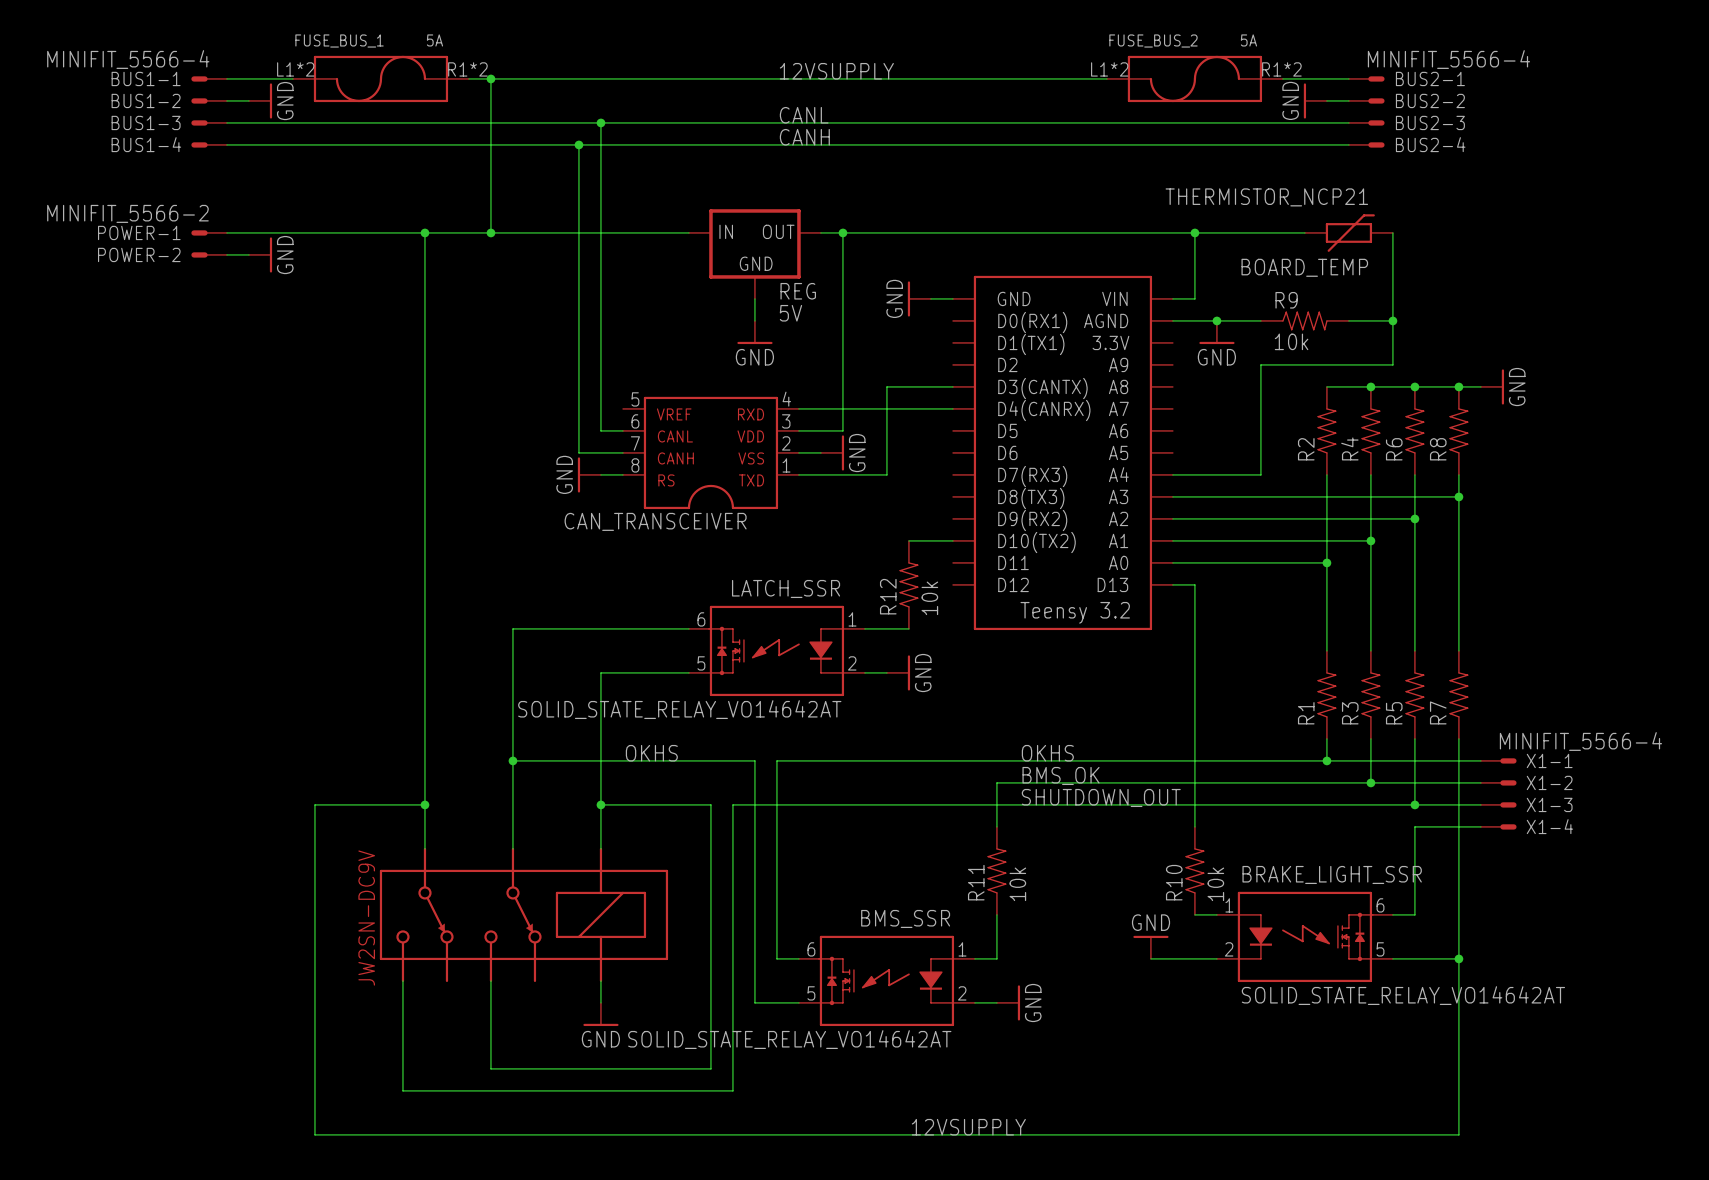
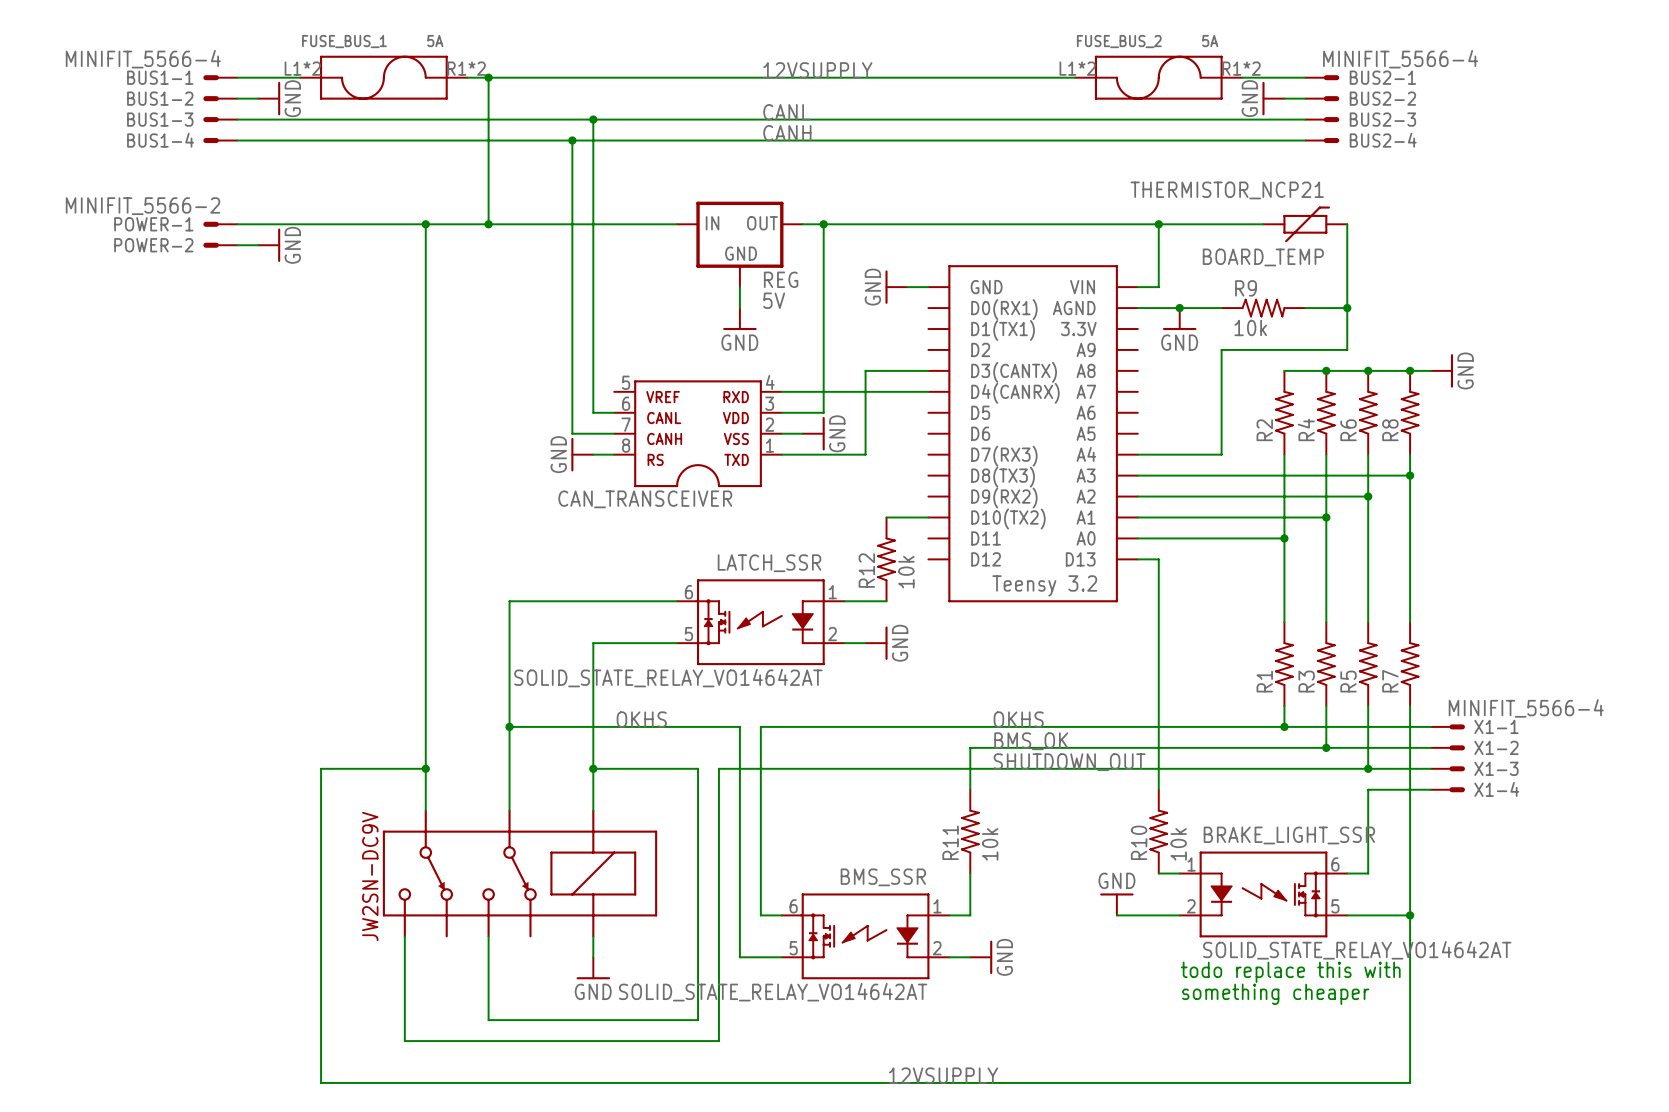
text: none -> todo replace this with (1290, 972)
text: none -> something cheaper (1275, 994)

